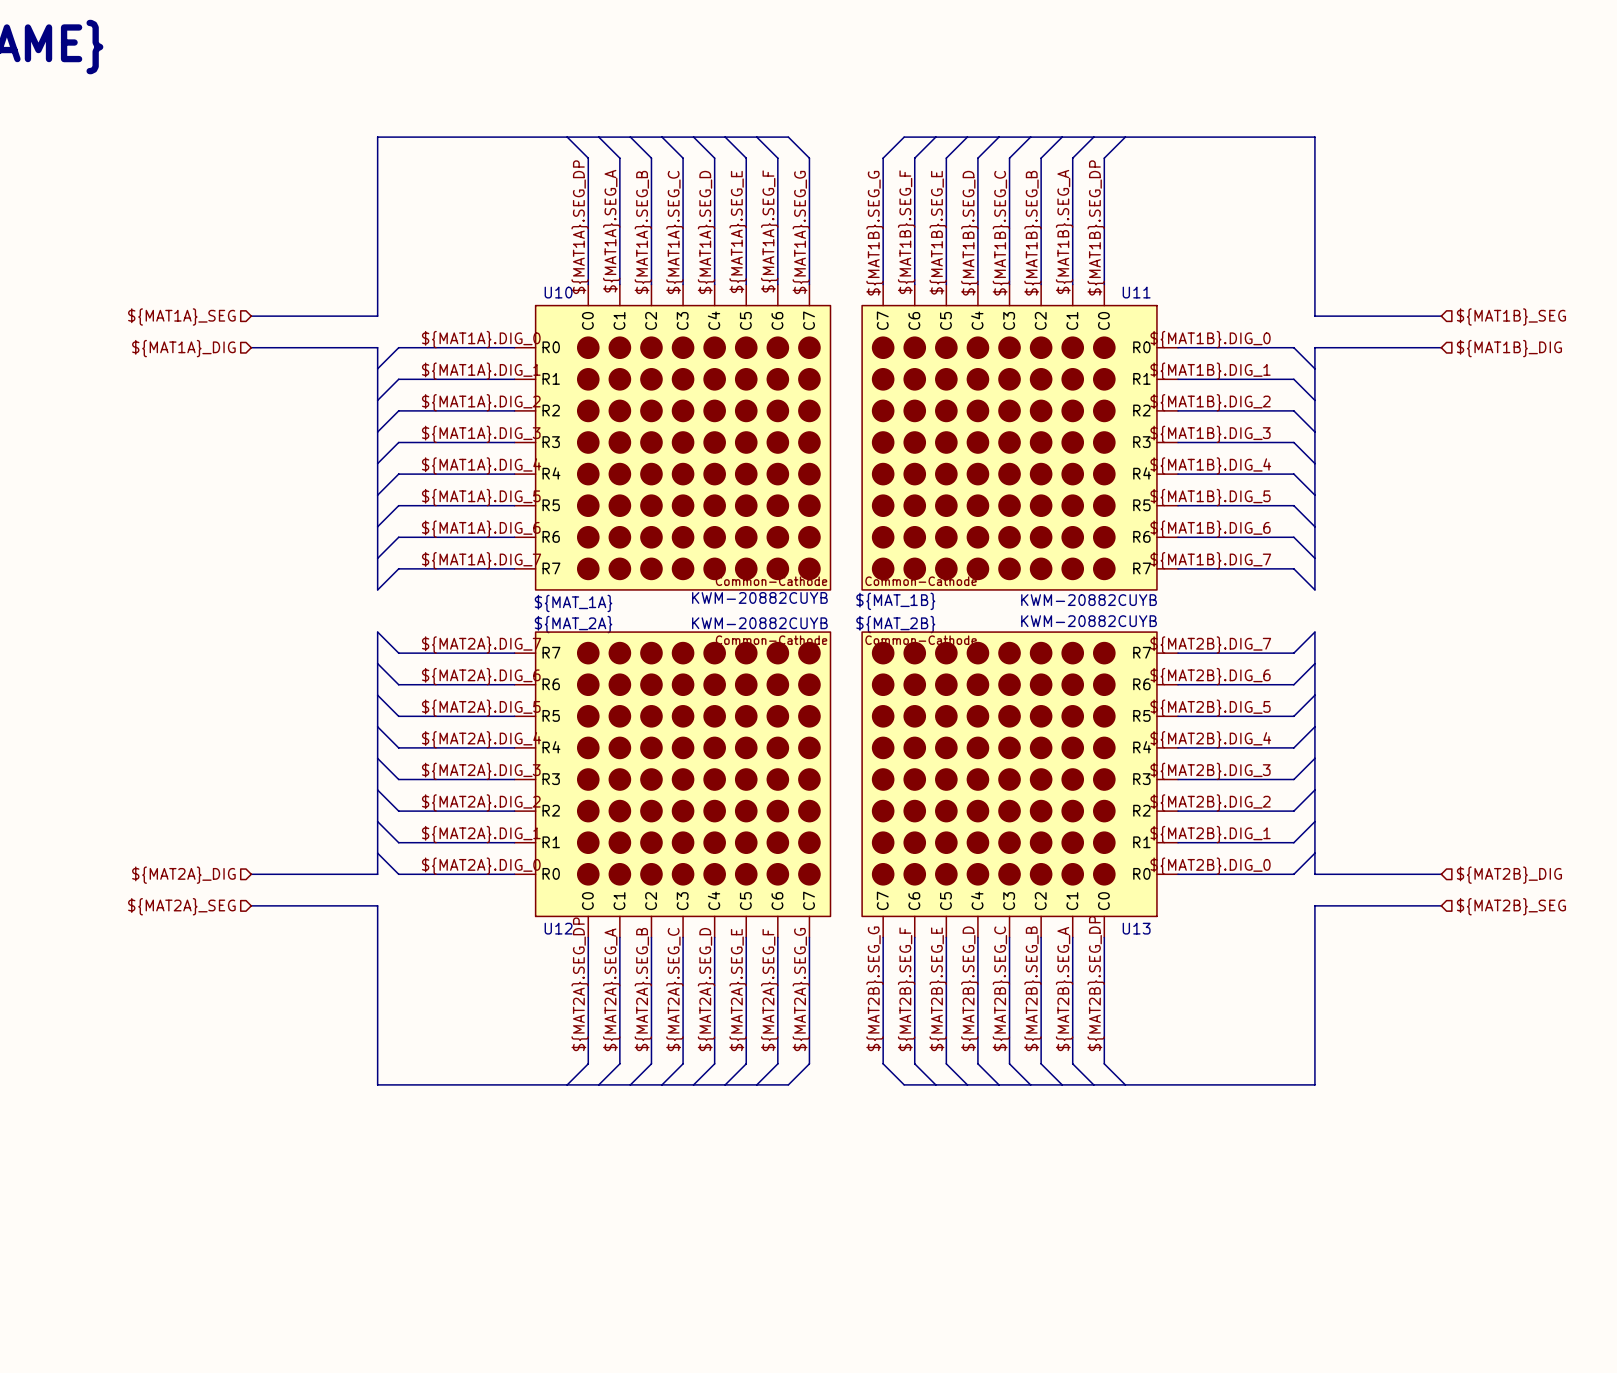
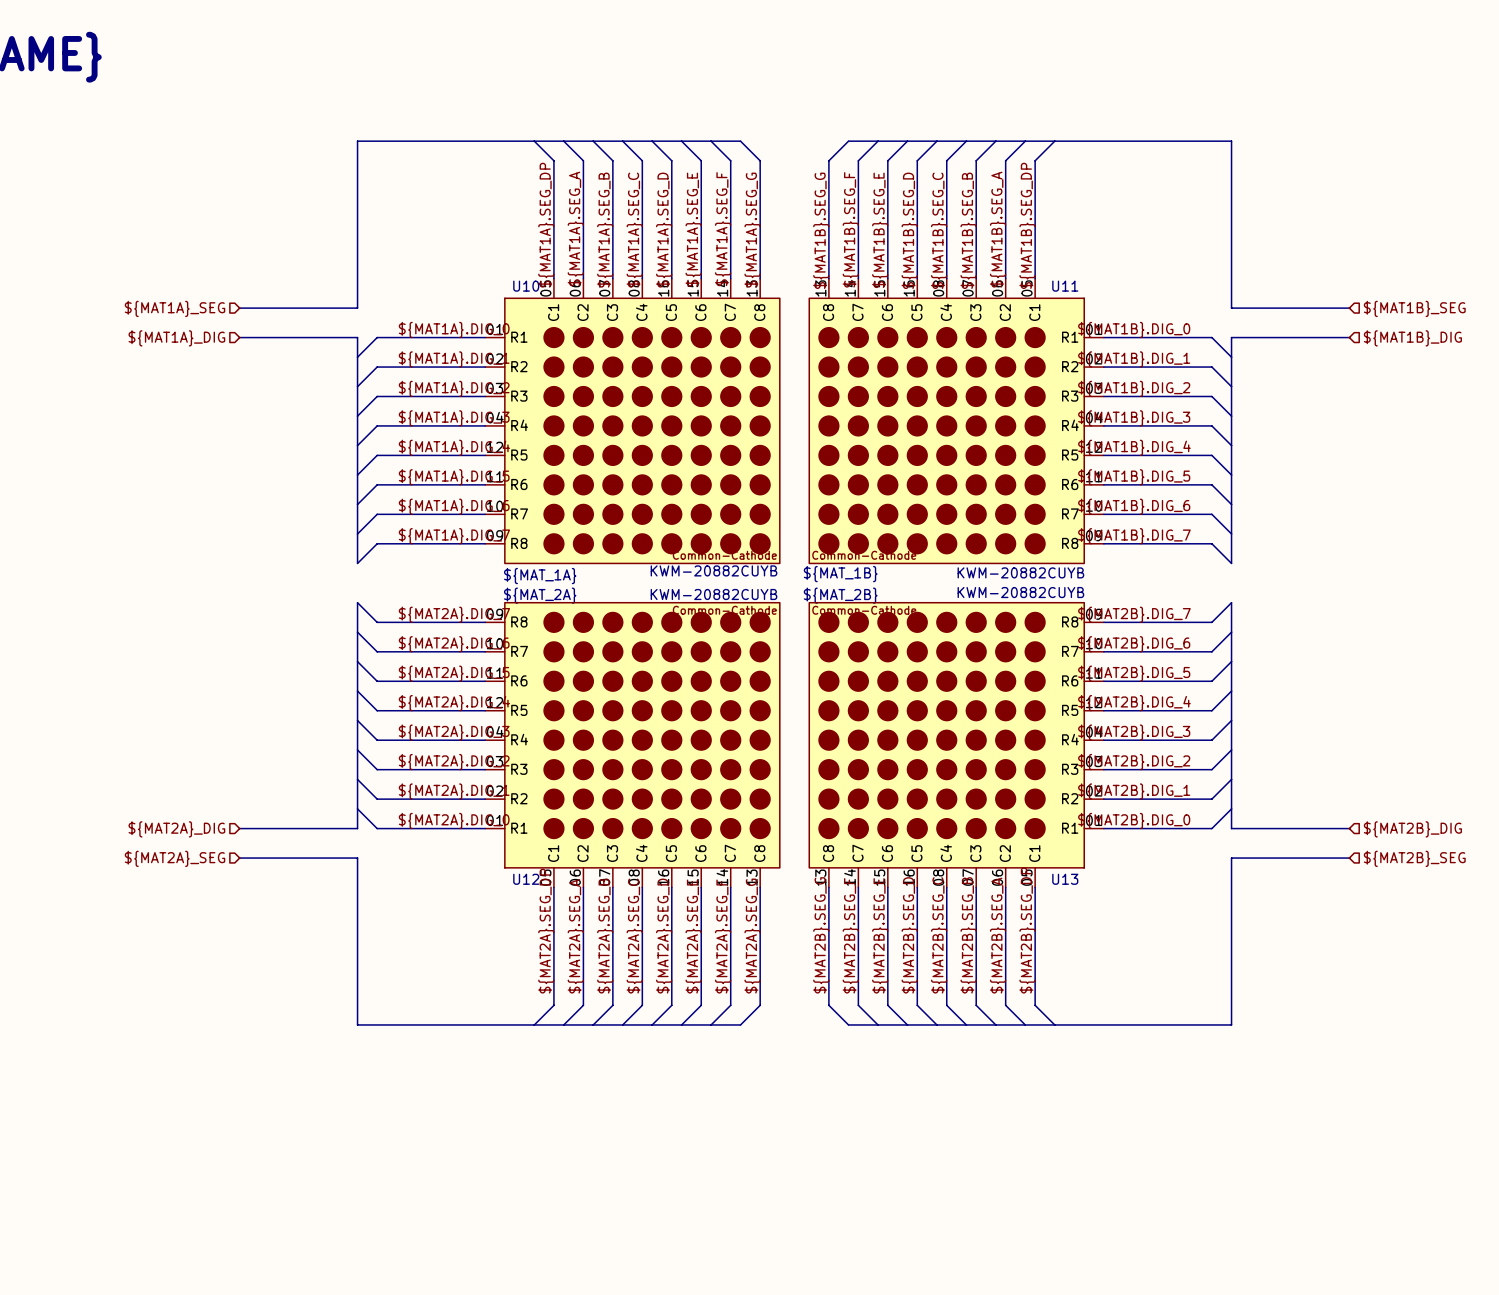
U10 symbol: [514, 284, 831, 590] -> [485, 278, 780, 564]
U11 symbol: [862, 284, 1179, 590] -> [809, 278, 1104, 564]
U12 symbol: [514, 632, 831, 938] -> [485, 602, 780, 888]
U13 symbol: [862, 632, 1179, 938] -> [809, 602, 1104, 888]

